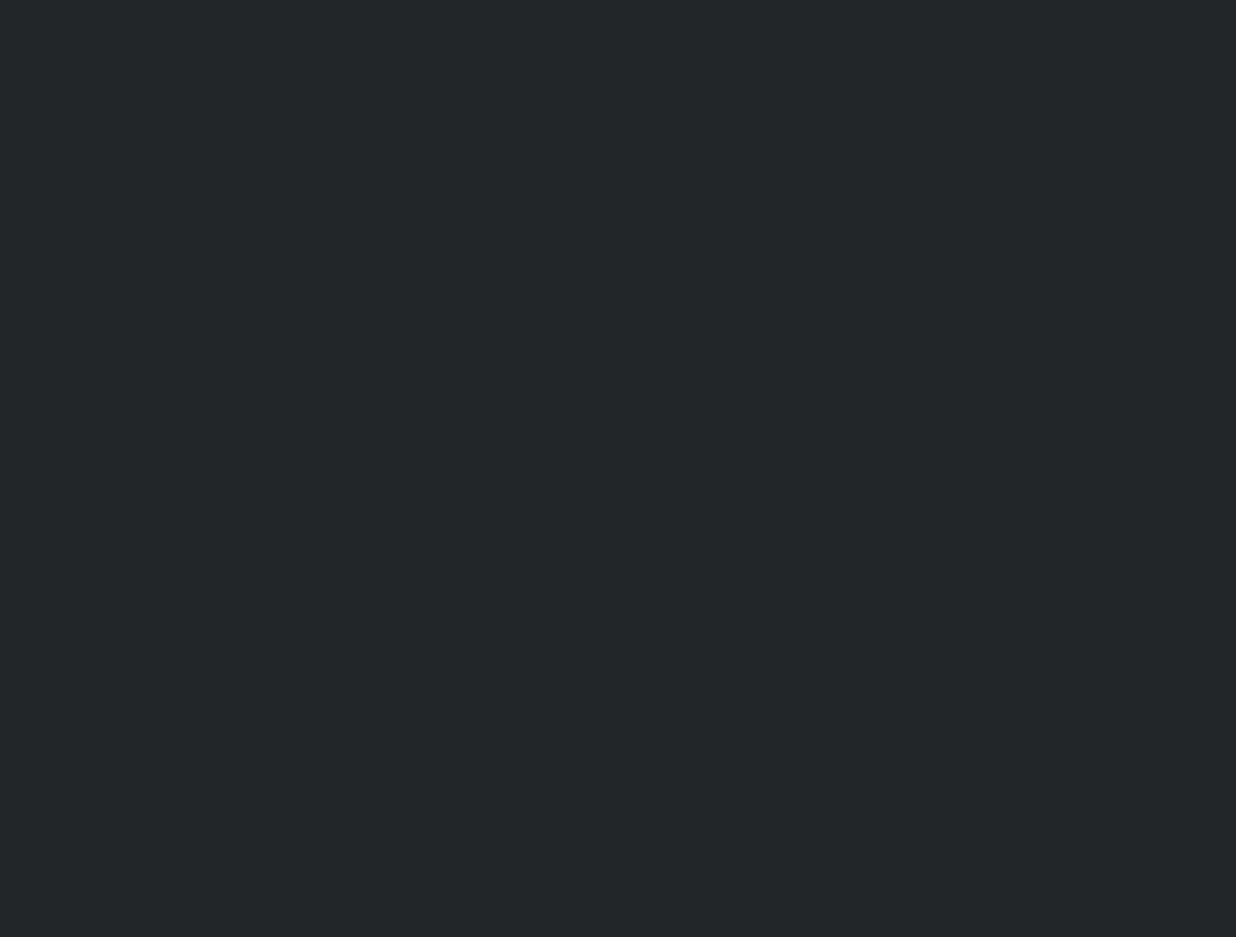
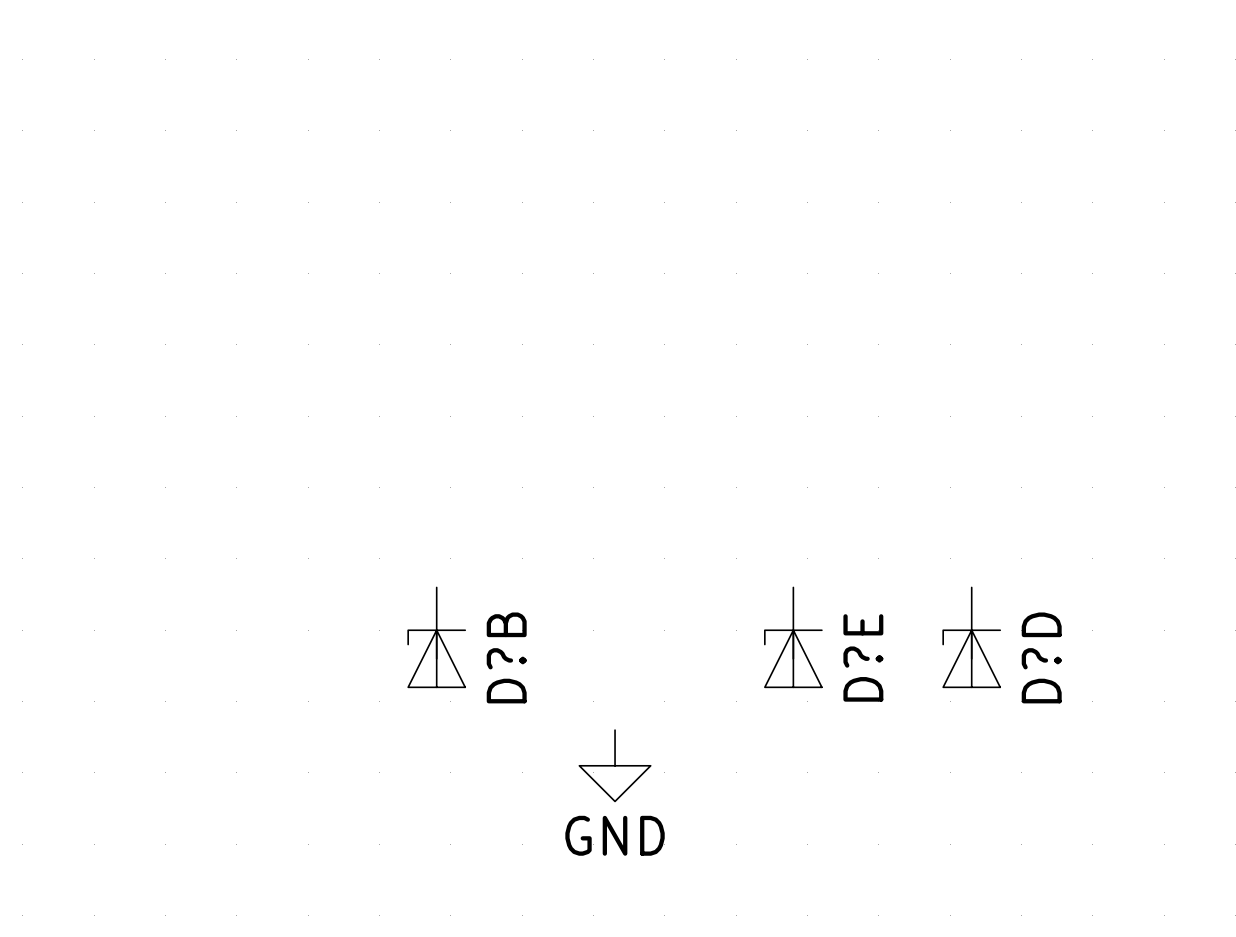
D?B: none -> (436, 637)
D?E: none -> (793, 637)
D?D: none -> (971, 637)
power symbol: none -> GND (615, 765)

